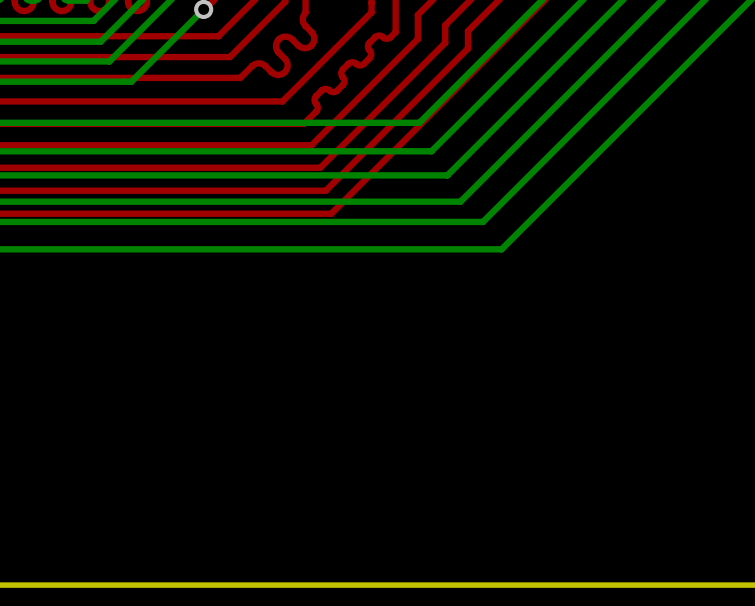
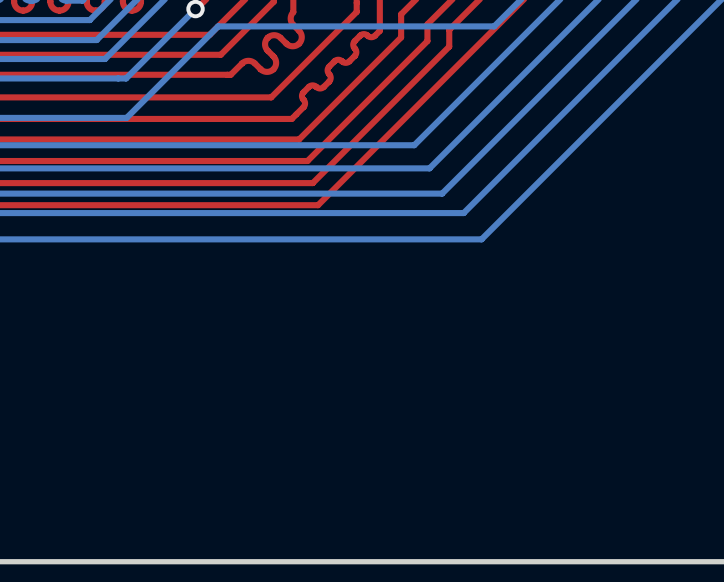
bottom track: (514, 27) (419, 122) (131, 122) -> (494, 26) (218, 26) (126, 117)

